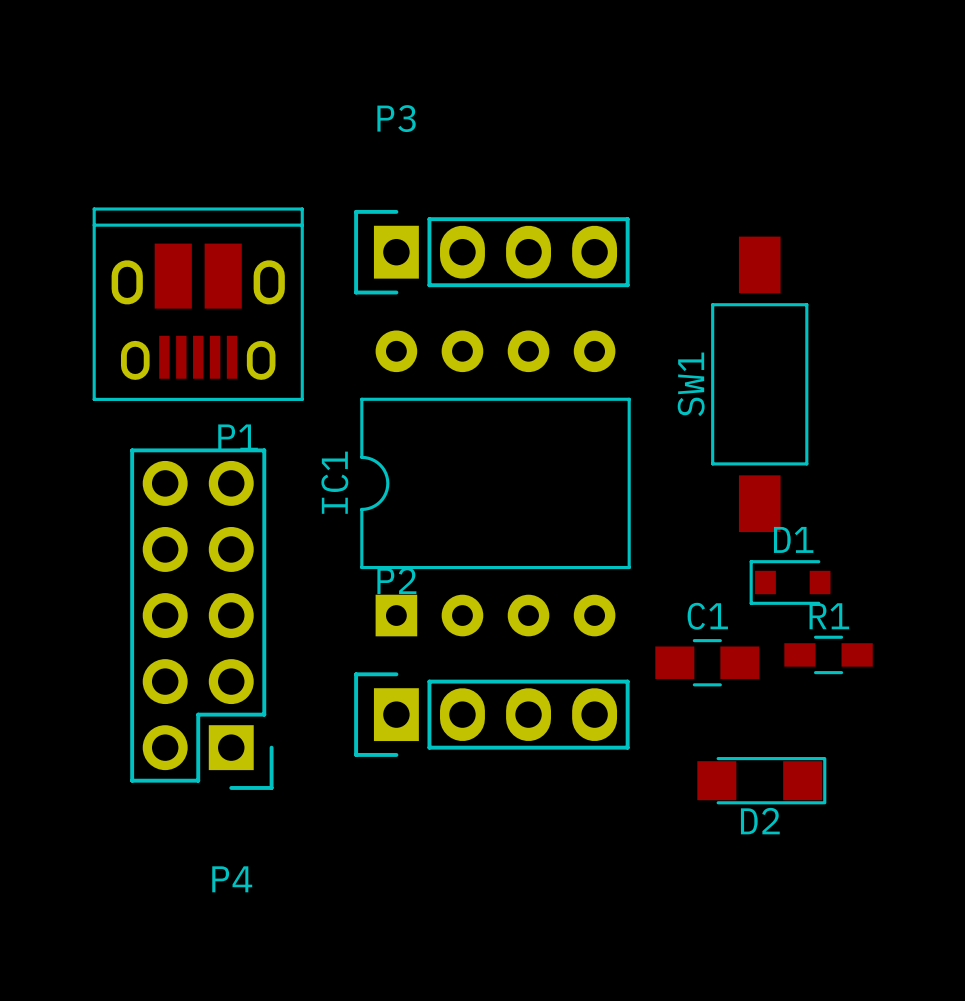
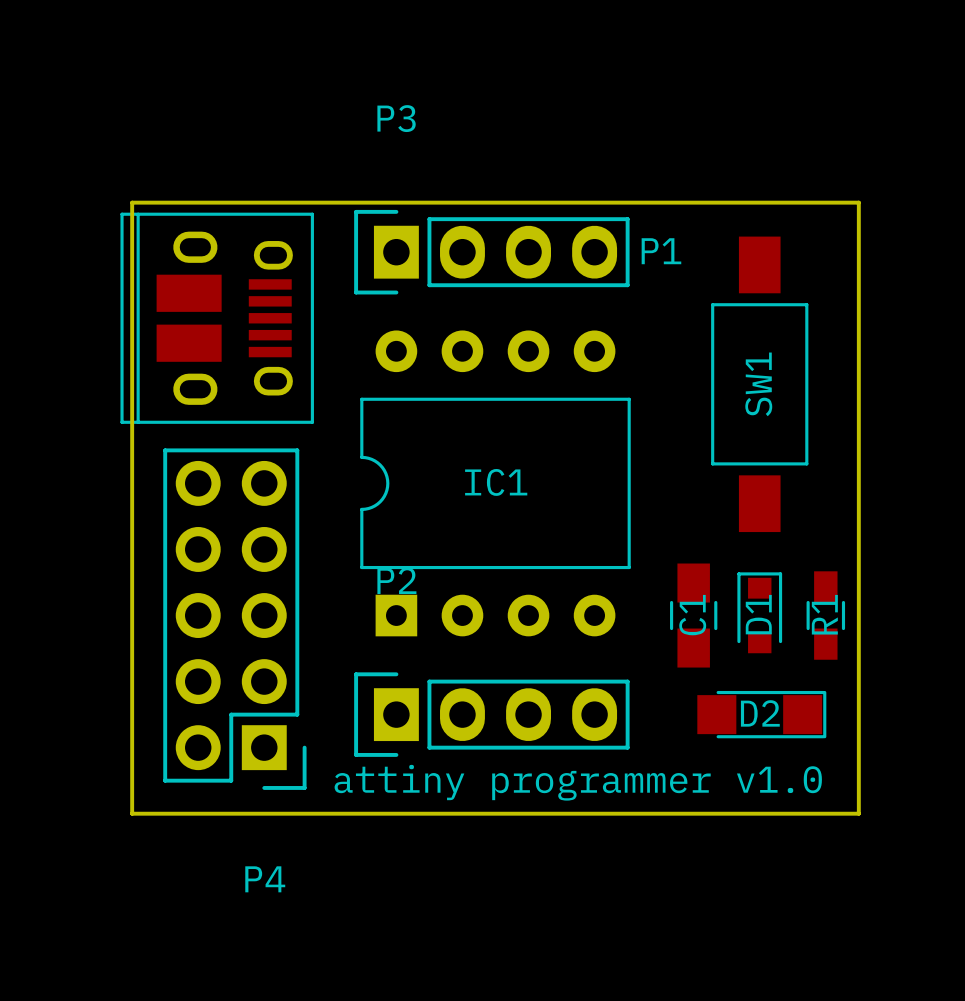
board edge: none -> (132, 202) (858, 202) (858, 813) (132, 813) (132, 202)
P1 rotation: 0° (198, 304) -> 90° counterclockwise (217, 318)
SW1 name position: SW1 (691, 384) -> SW1 (758, 384)
P1 name position: P1 (238, 437) -> P1 (661, 251)
IC1 name rotation: 0° (334, 482) -> 90° clockwise (496, 482)
IC1 name position: IC1 (334, 482) -> IC1 (496, 482)
D1 rotation: 0° (790, 582) -> 90° clockwise (759, 612)
P4 position: (201, 619) -> (234, 619)
R1 rotation: 0° (828, 654) -> 90° clockwise (825, 615)
C1 rotation: 0° (707, 662) -> 90° clockwise (693, 615)
D2 position: (761, 780) -> (761, 714)
text: none -> attiny programmer v1.0 (578, 782)
D2 name position: D2 (760, 821) -> D2 (760, 713)

